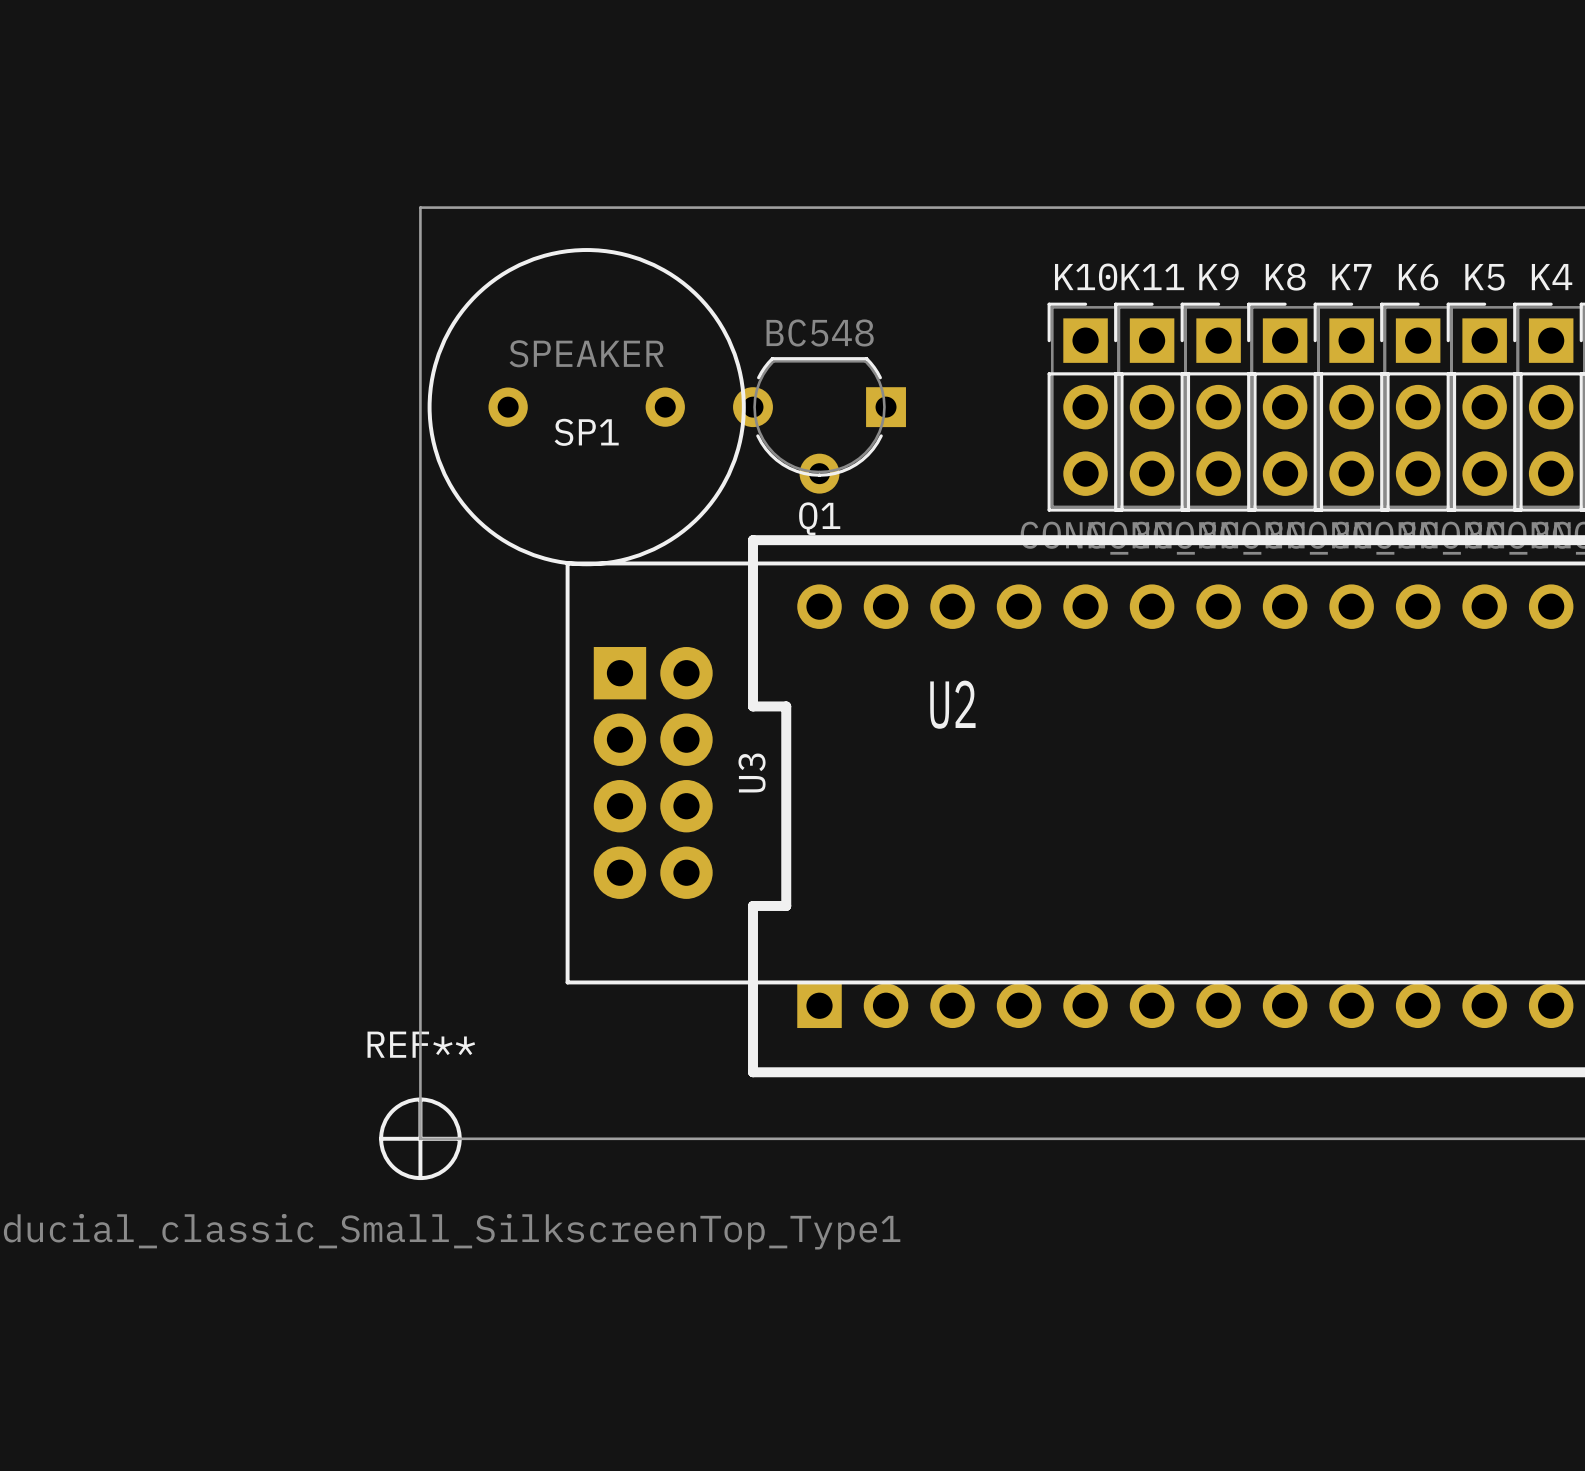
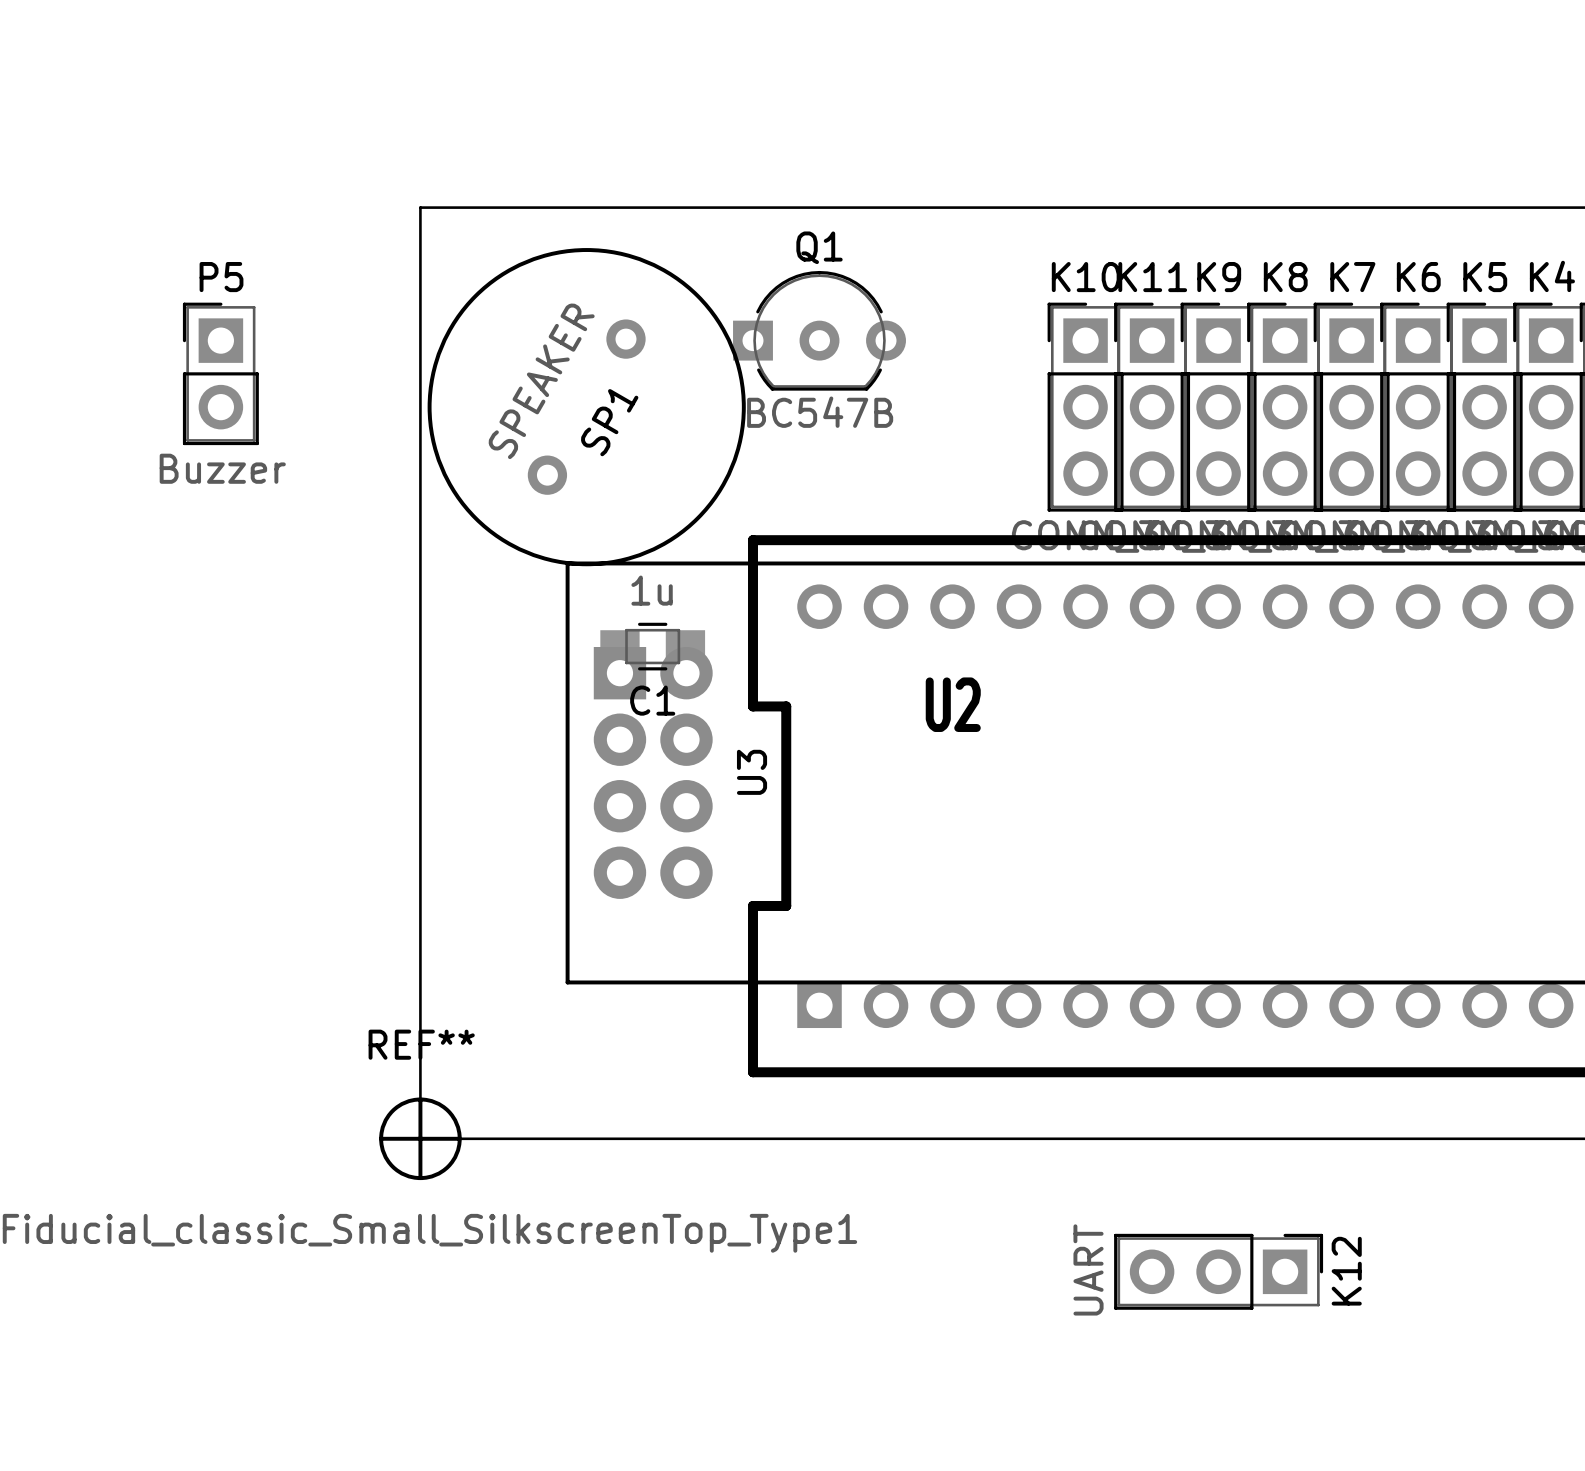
Q1 value: BC548 (820, 332) -> BC547B (820, 412)
Q1 footprint: [733, 357, 906, 494] -> [733, 270, 906, 391]
P5: none -> Buzzer (220, 373)
SP1 rotation: 0° (586, 407) -> 60° counterclockwise (586, 407)
Q1 name position: Q1 (819, 518) -> Q1 (819, 247)
C1: none -> 1u (652, 646)
K12: none -> UART (1218, 1271)

